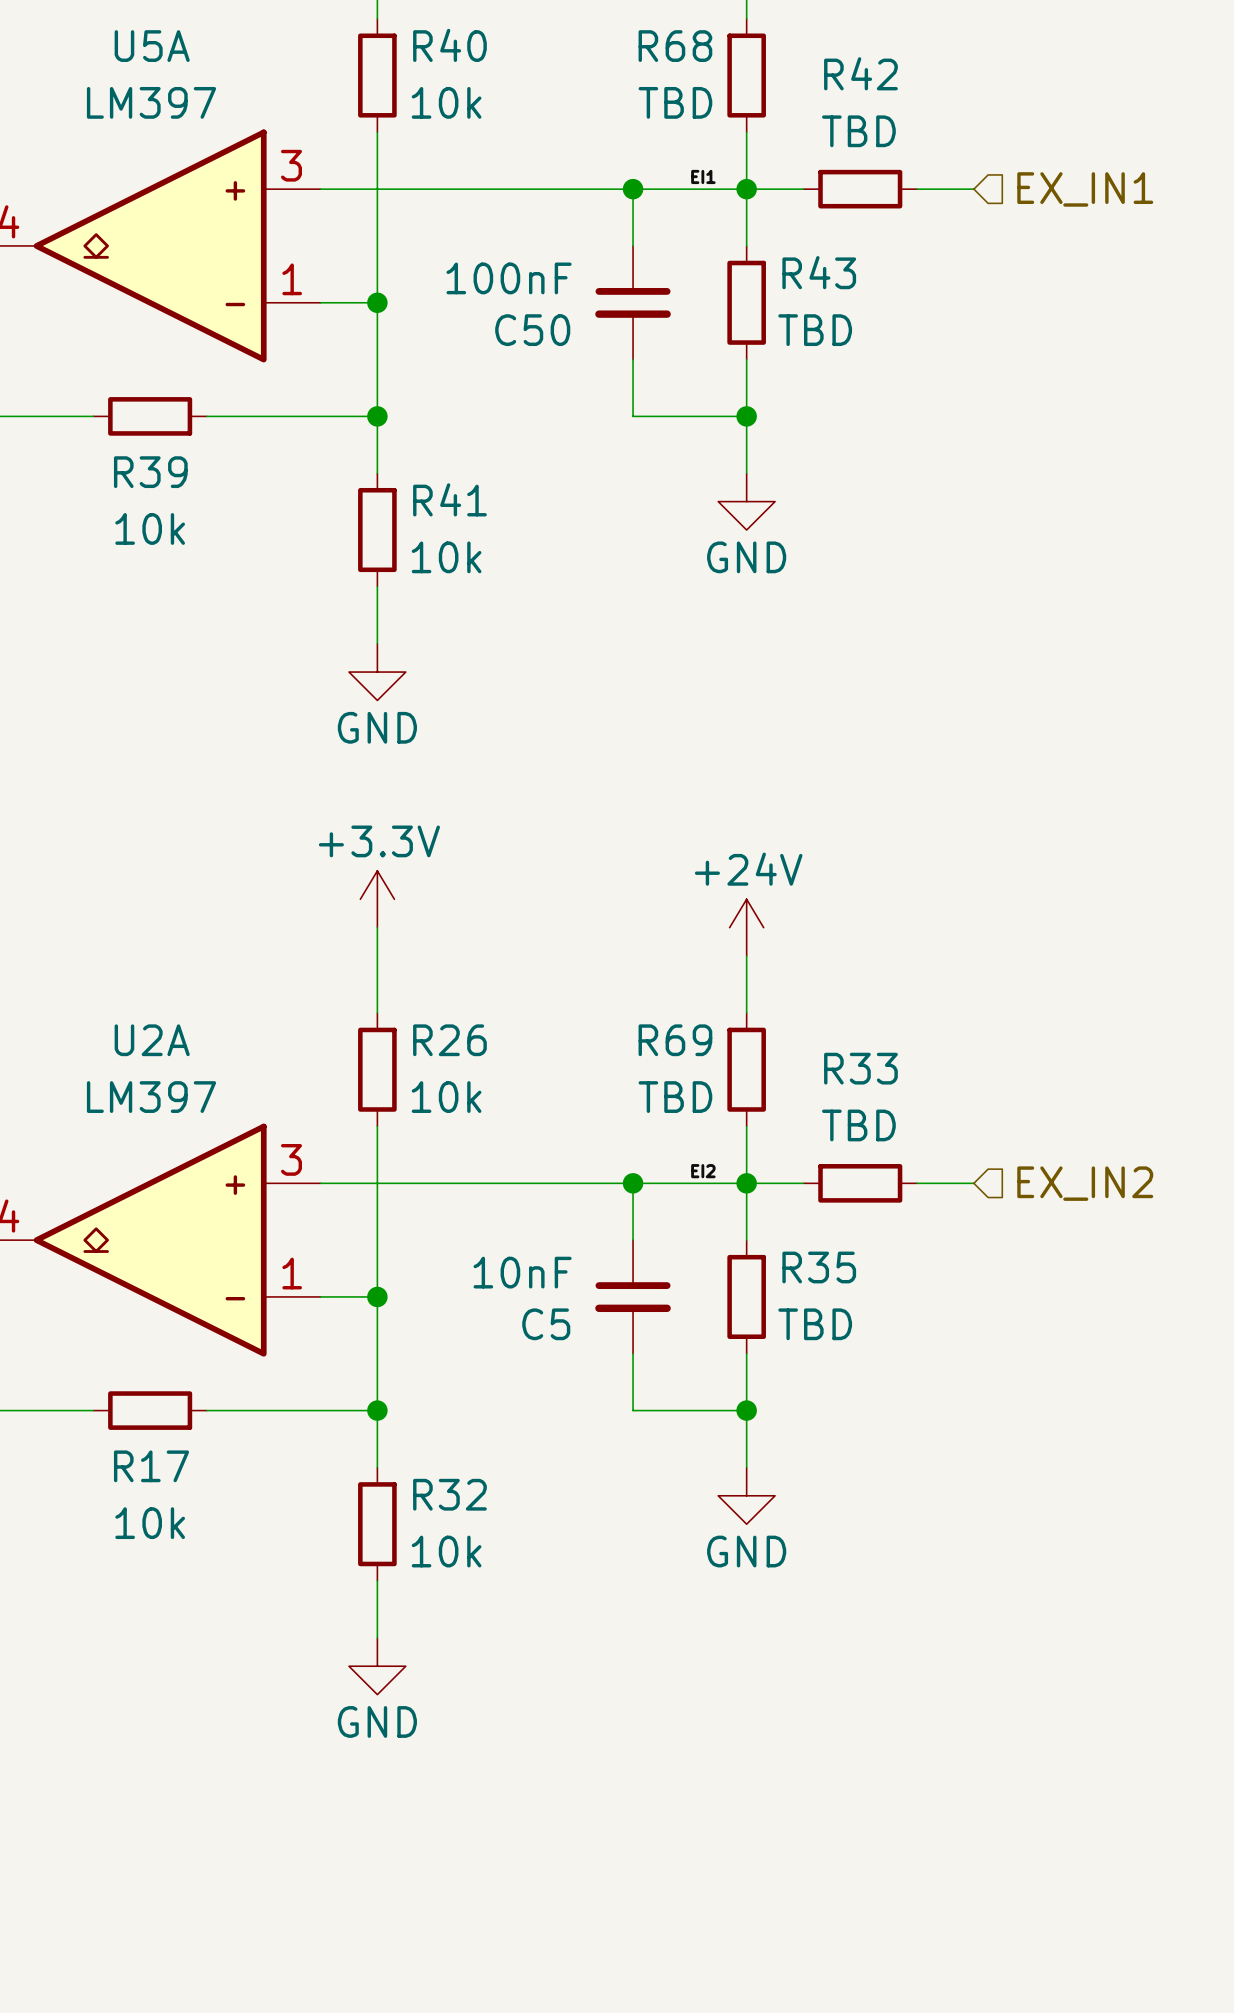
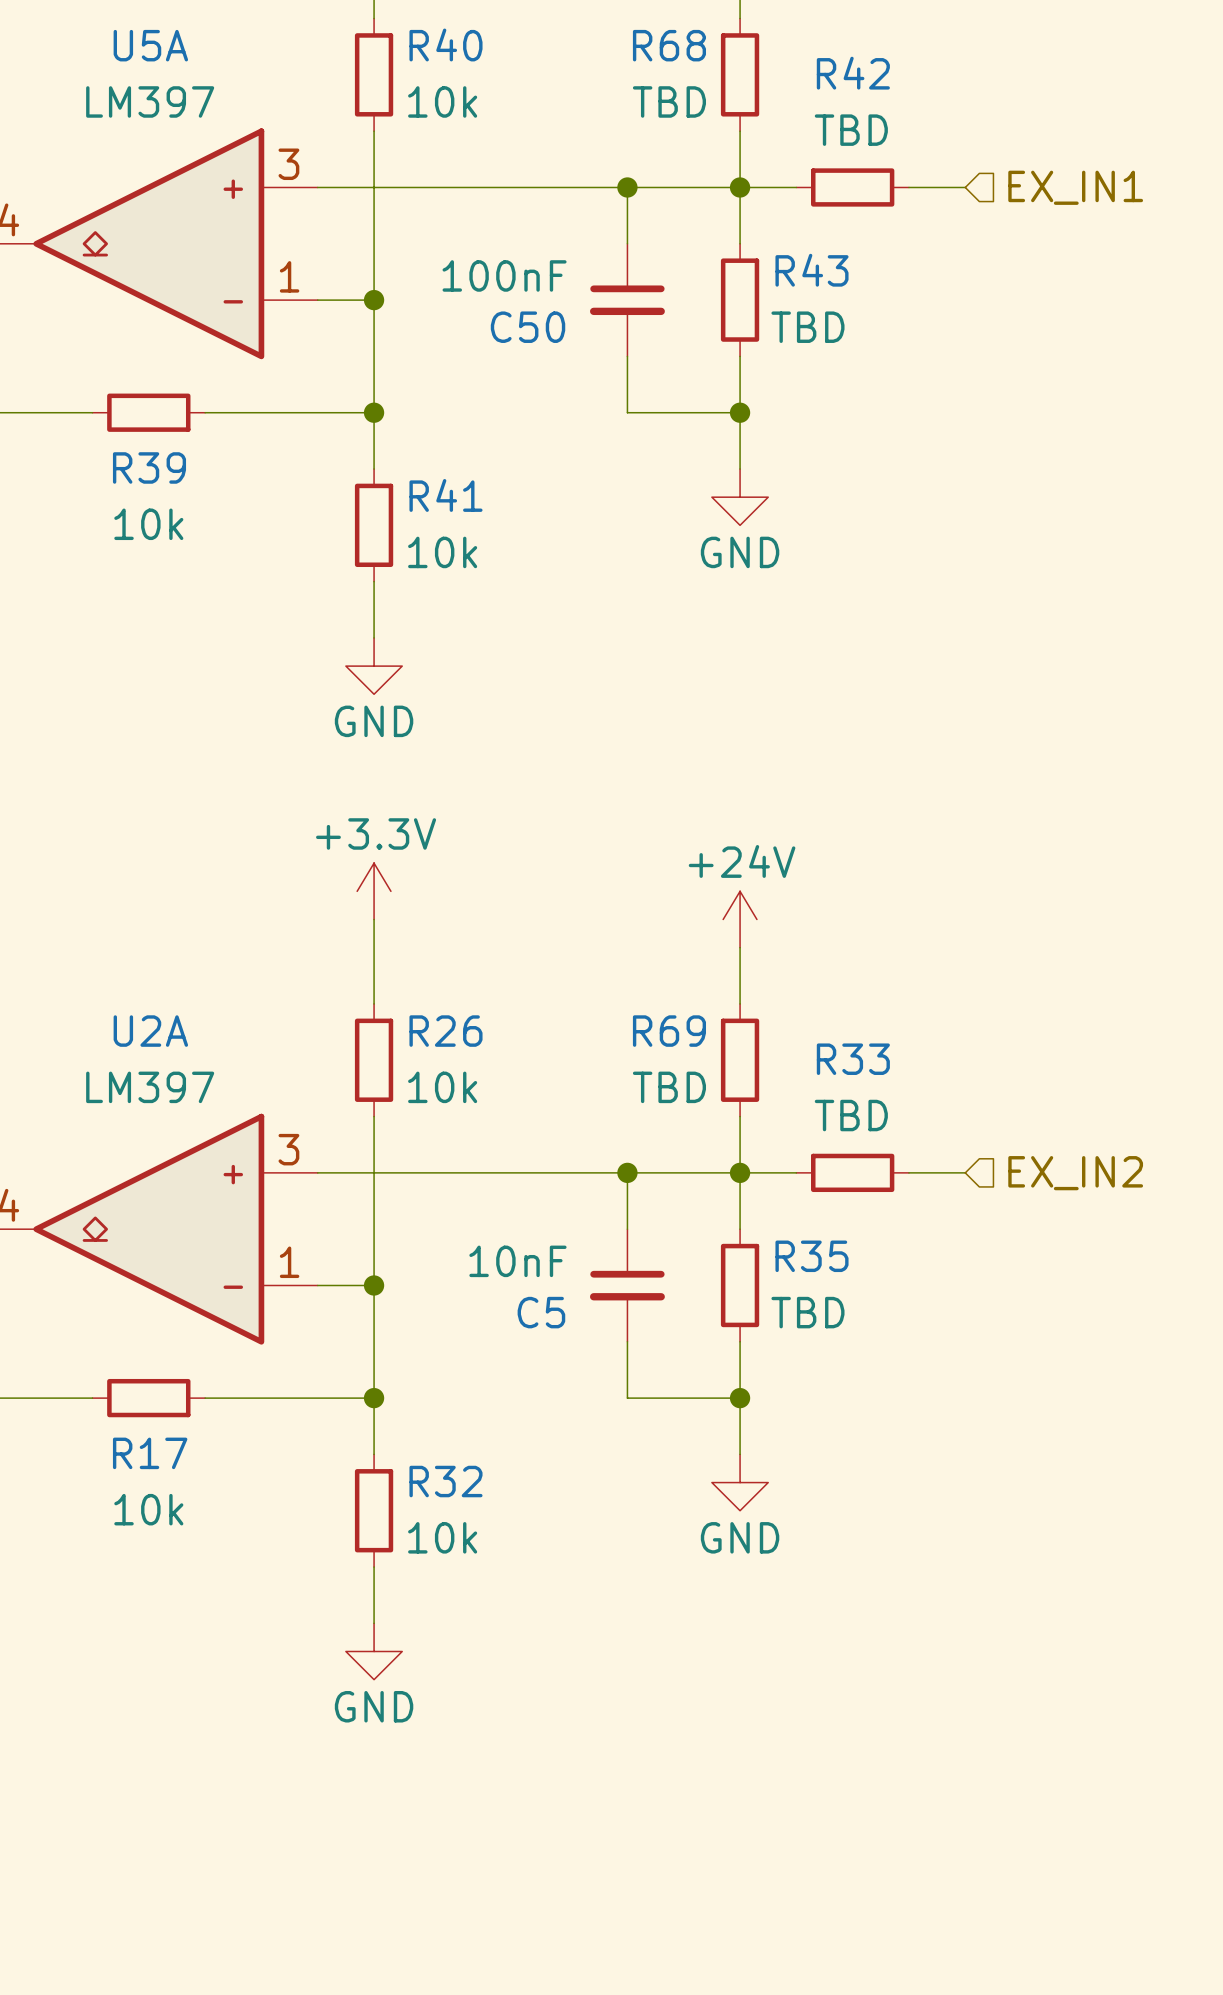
label: EI1 (703, 176) -> none
label: EI2 (703, 1171) -> none

